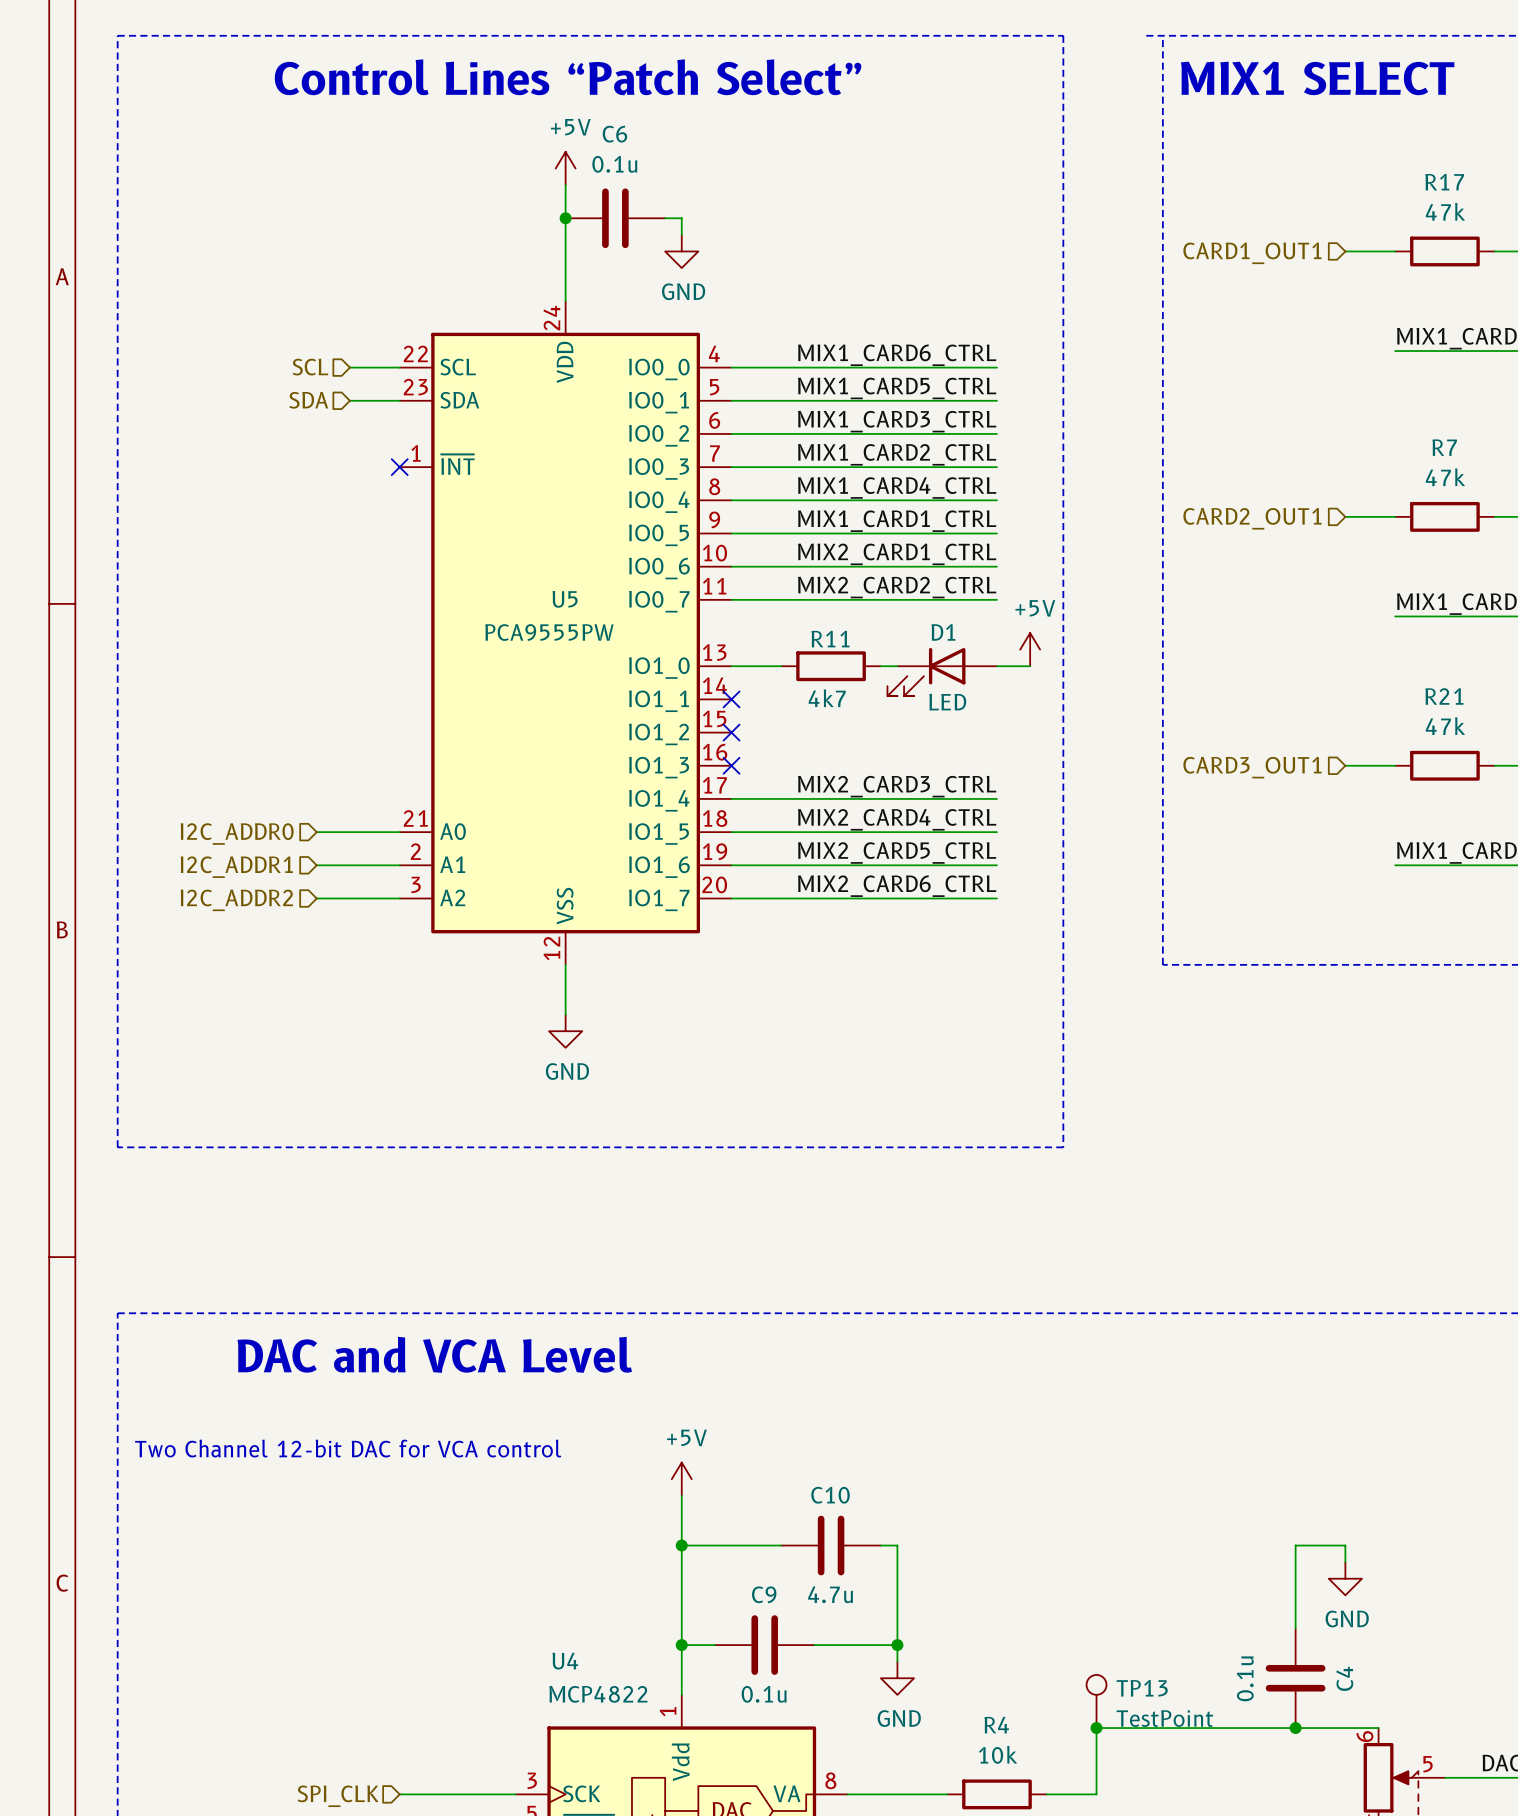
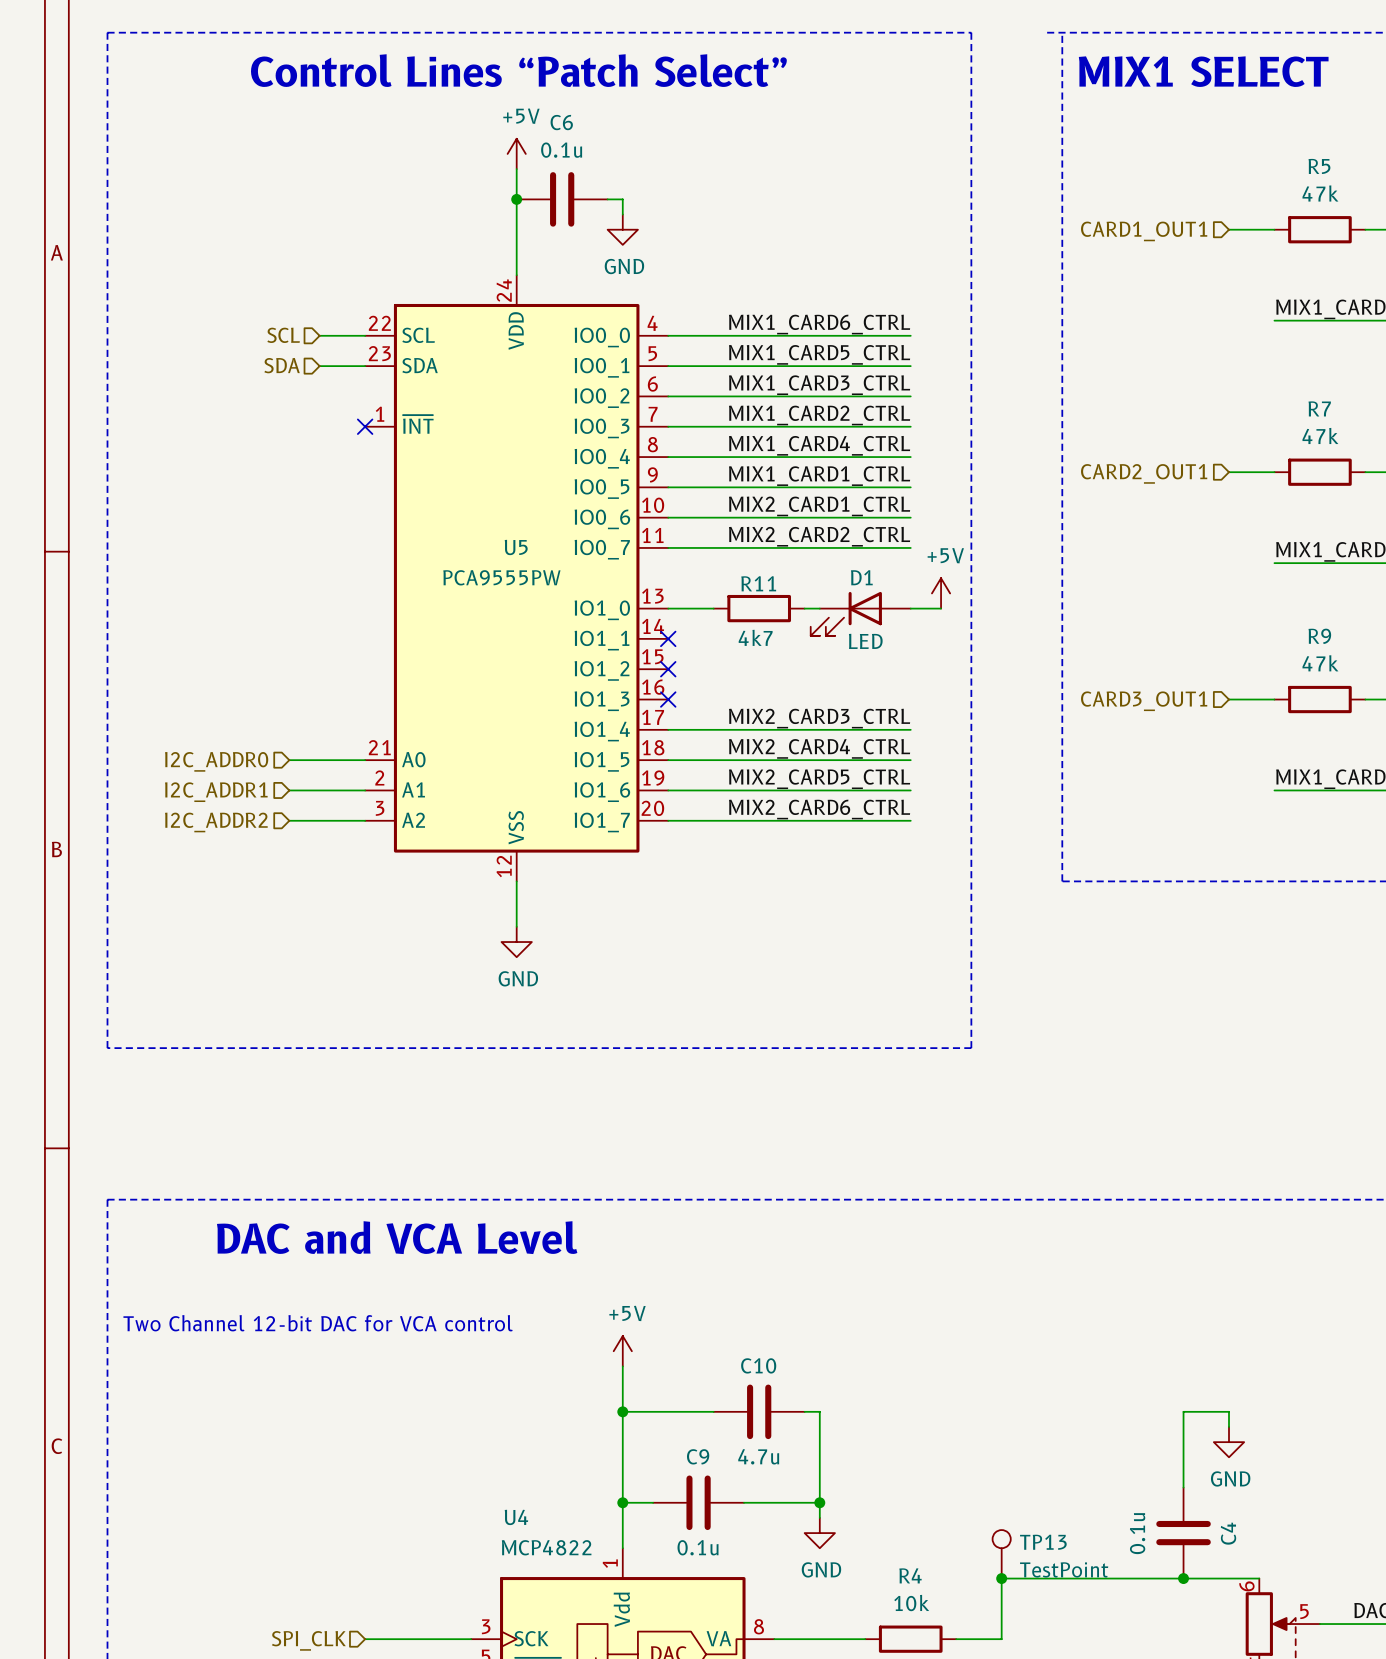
R17 name: R17 (1444, 182) -> R5 (1319, 166)
R21 name: R21 (1444, 696) -> R9 (1319, 636)

